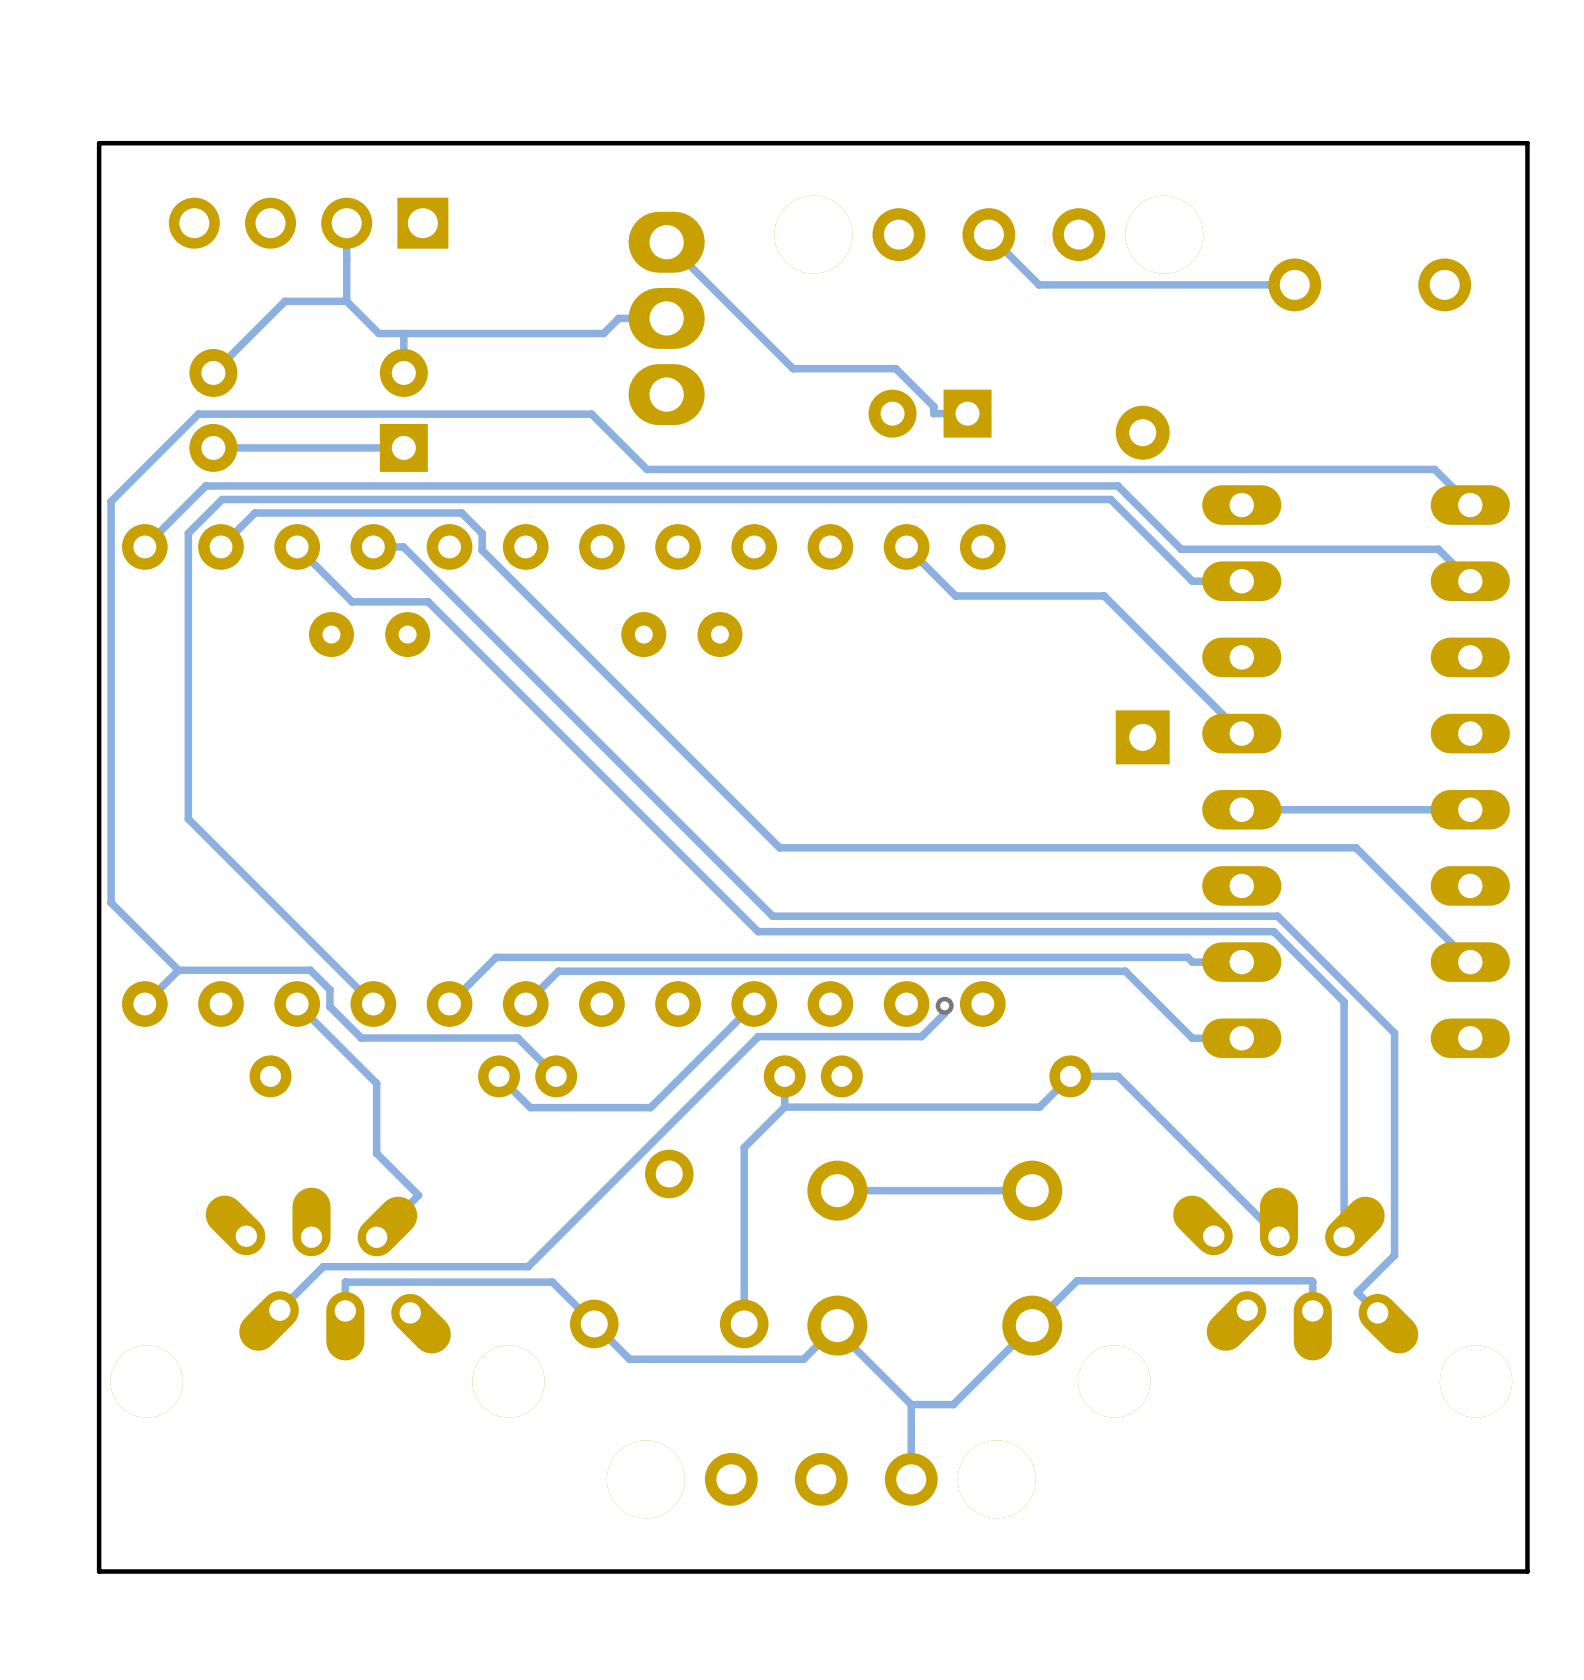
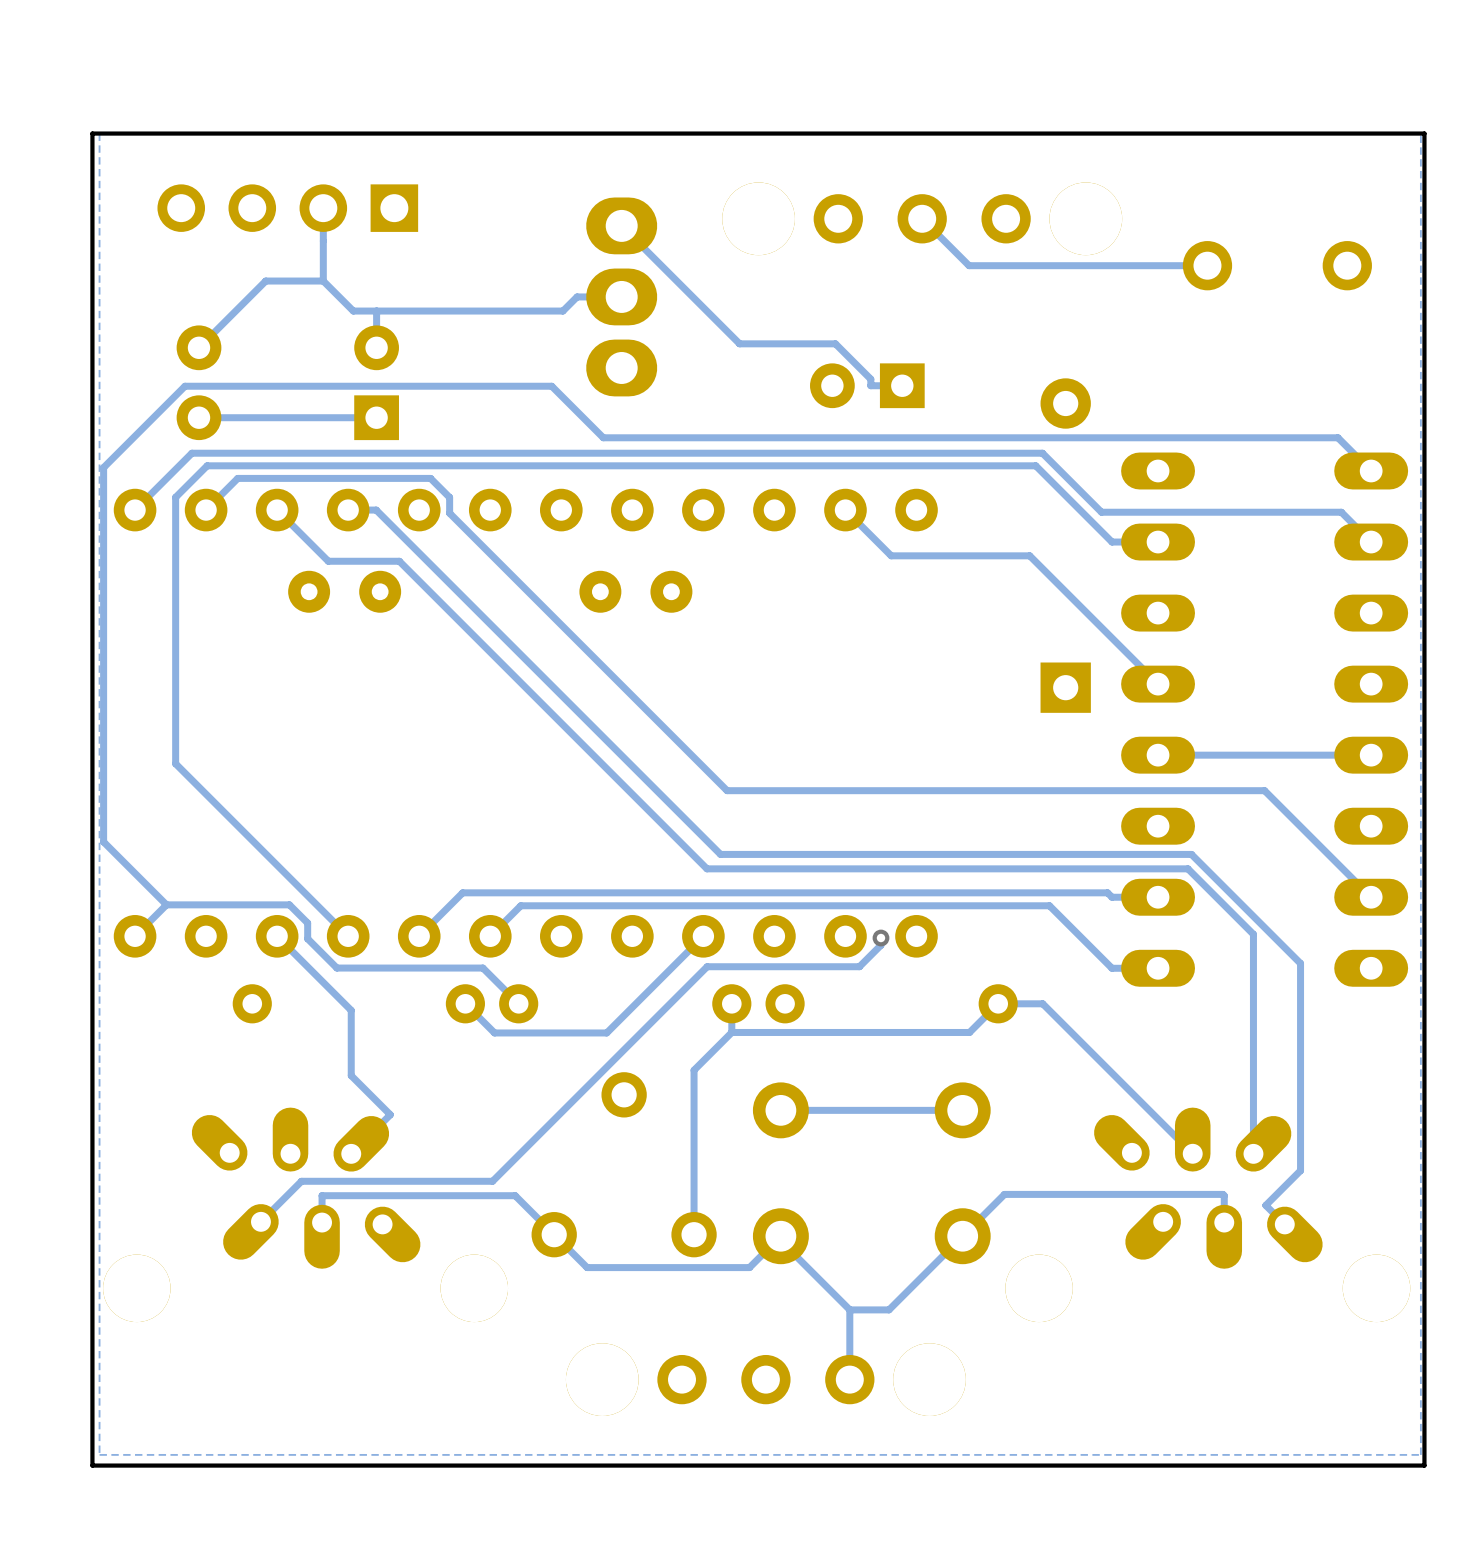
zone outline: none -> (1420, 133) (99, 133) (99, 1454) (1420, 1454) (1420, 133)

